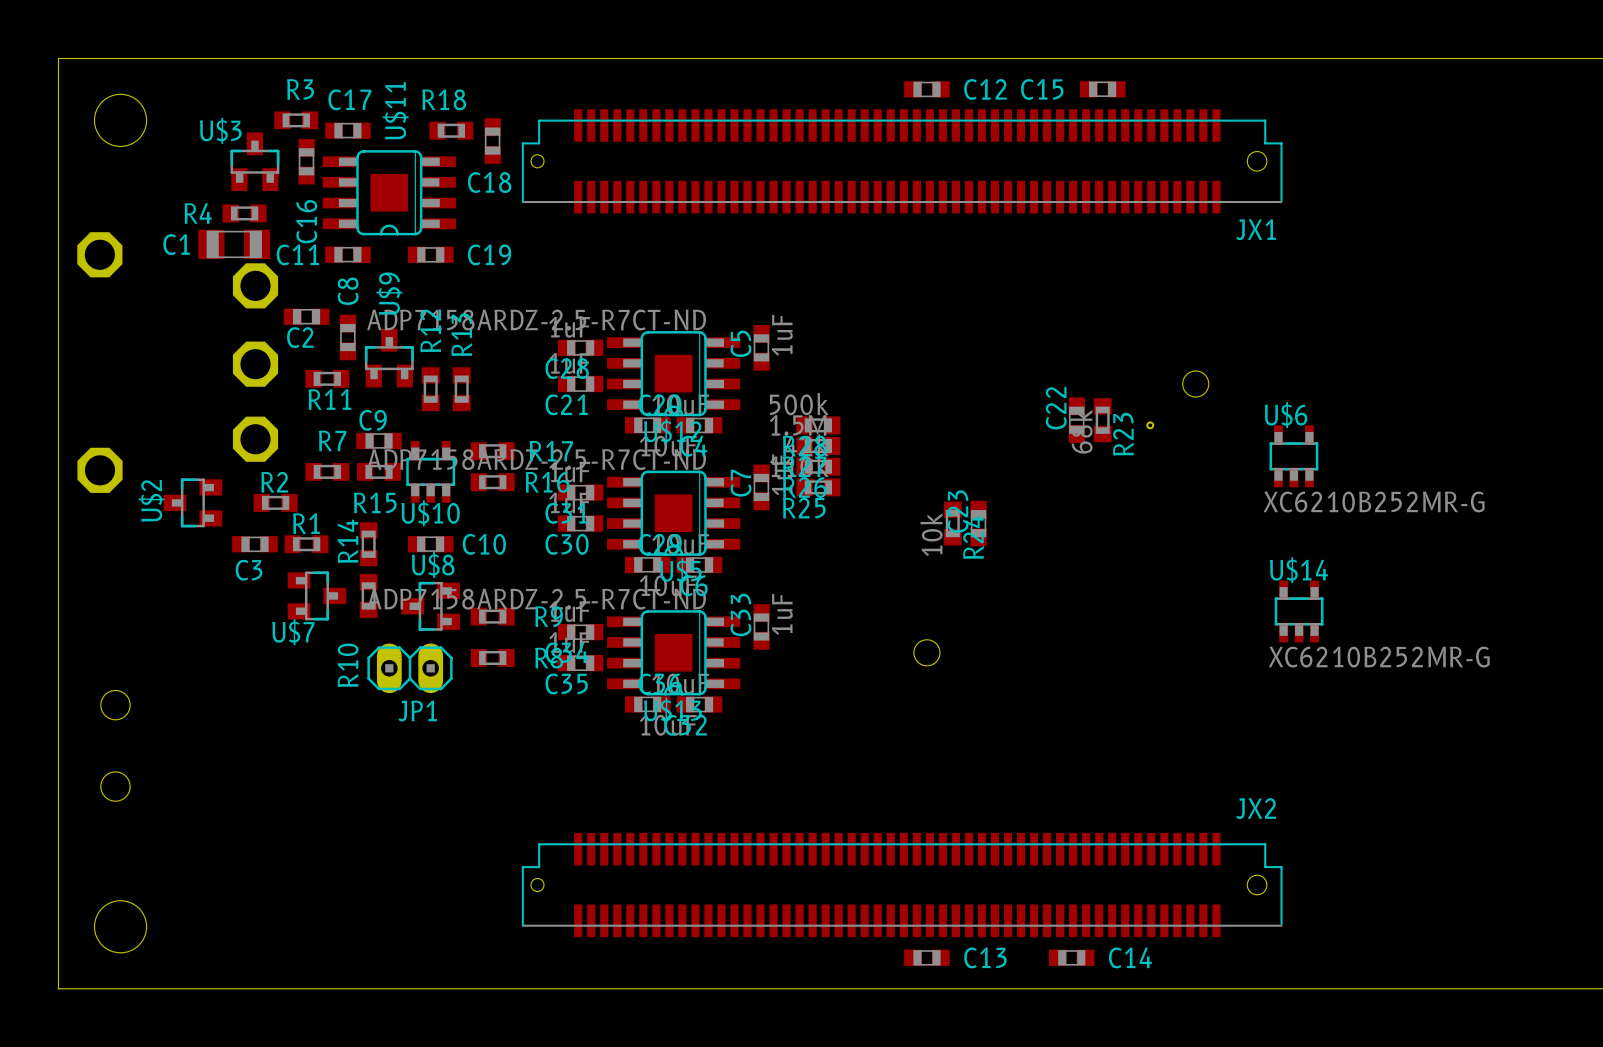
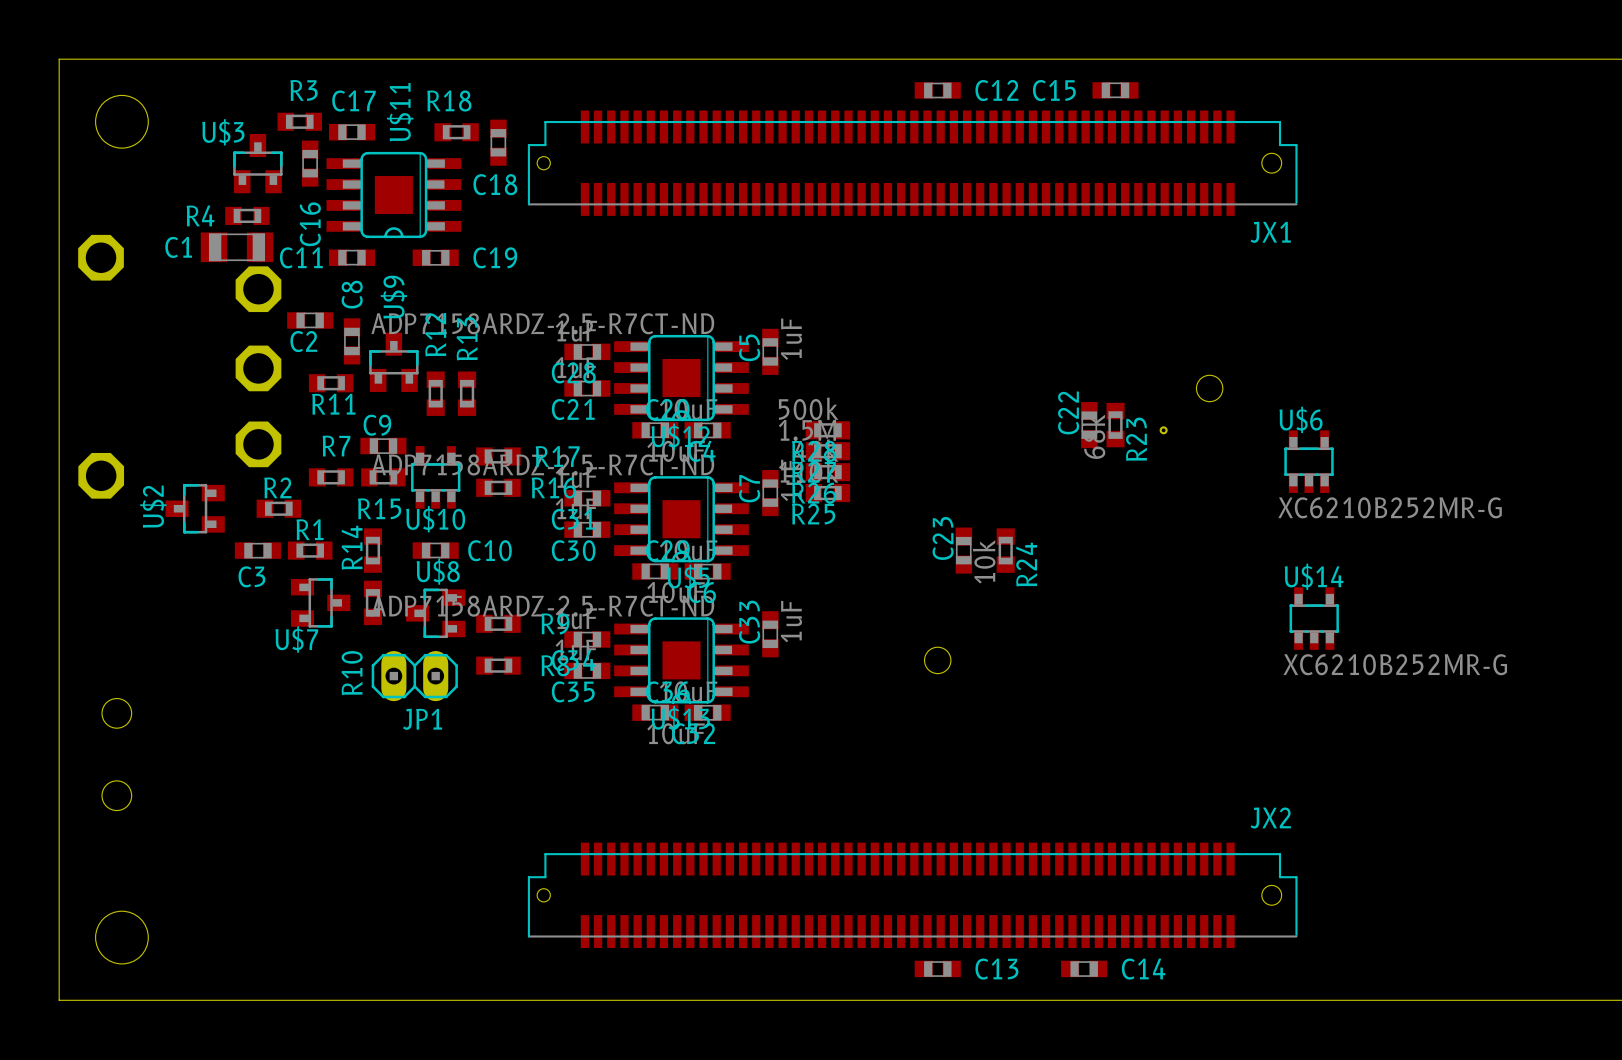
R24 position: (952, 523) -> (1005, 550)
C23 position: (978, 523) -> (963, 550)

